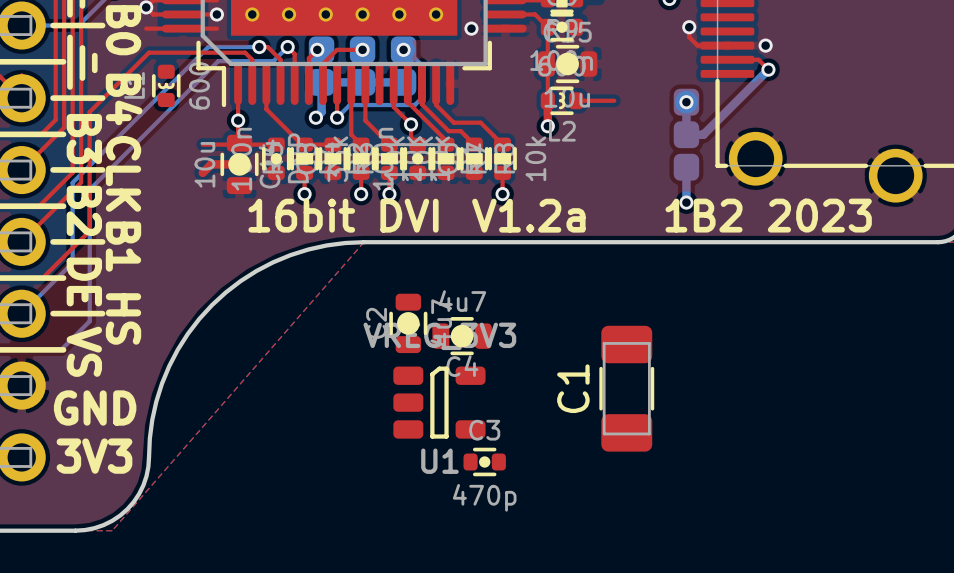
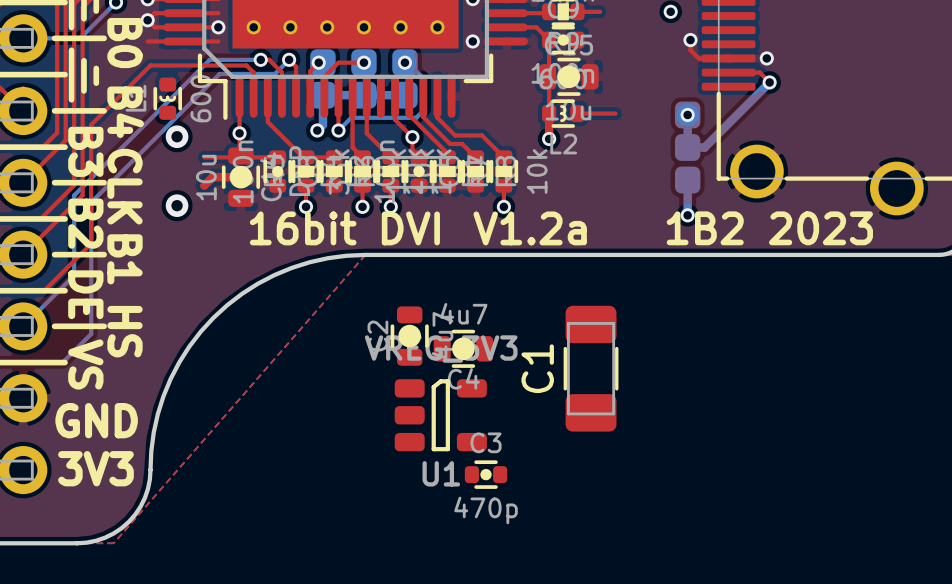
via: none -> (177, 136)
via: none -> (177, 205)
C1 position: (626, 388) -> (591, 368)

